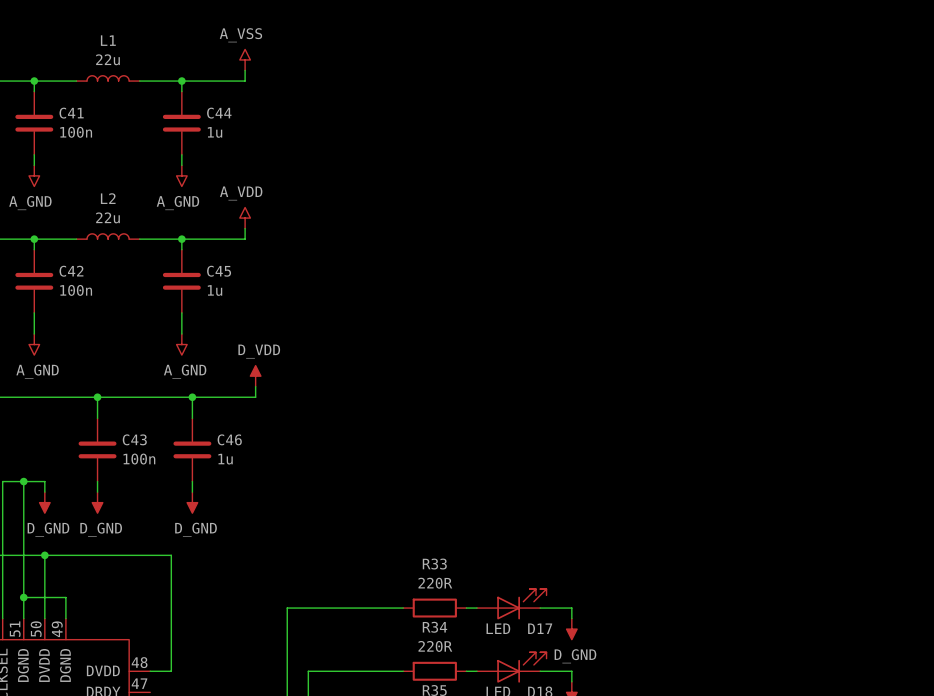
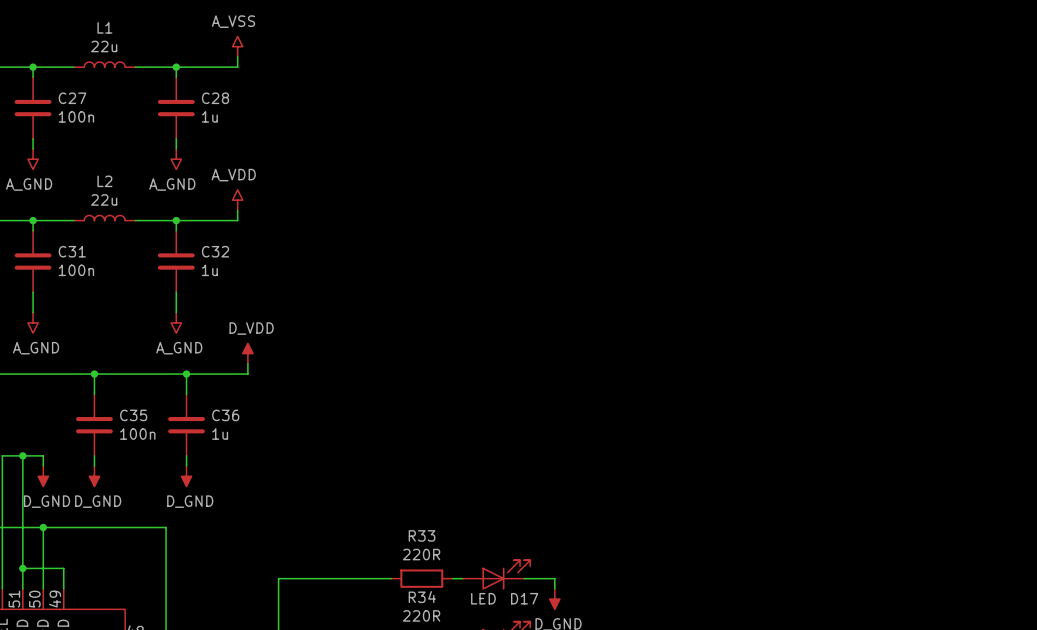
C41 name: C41 (71, 113) -> C27 (72, 98)
C44 name: C44 (219, 113) -> C28 (215, 98)
C42 name: C42 (71, 271) -> C31 (72, 251)
C45 name: C45 (219, 271) -> C32 (215, 251)
C43 name: C43 (134, 439) -> C35 (133, 415)
C46 name: C46 (229, 439) -> C36 (225, 415)

